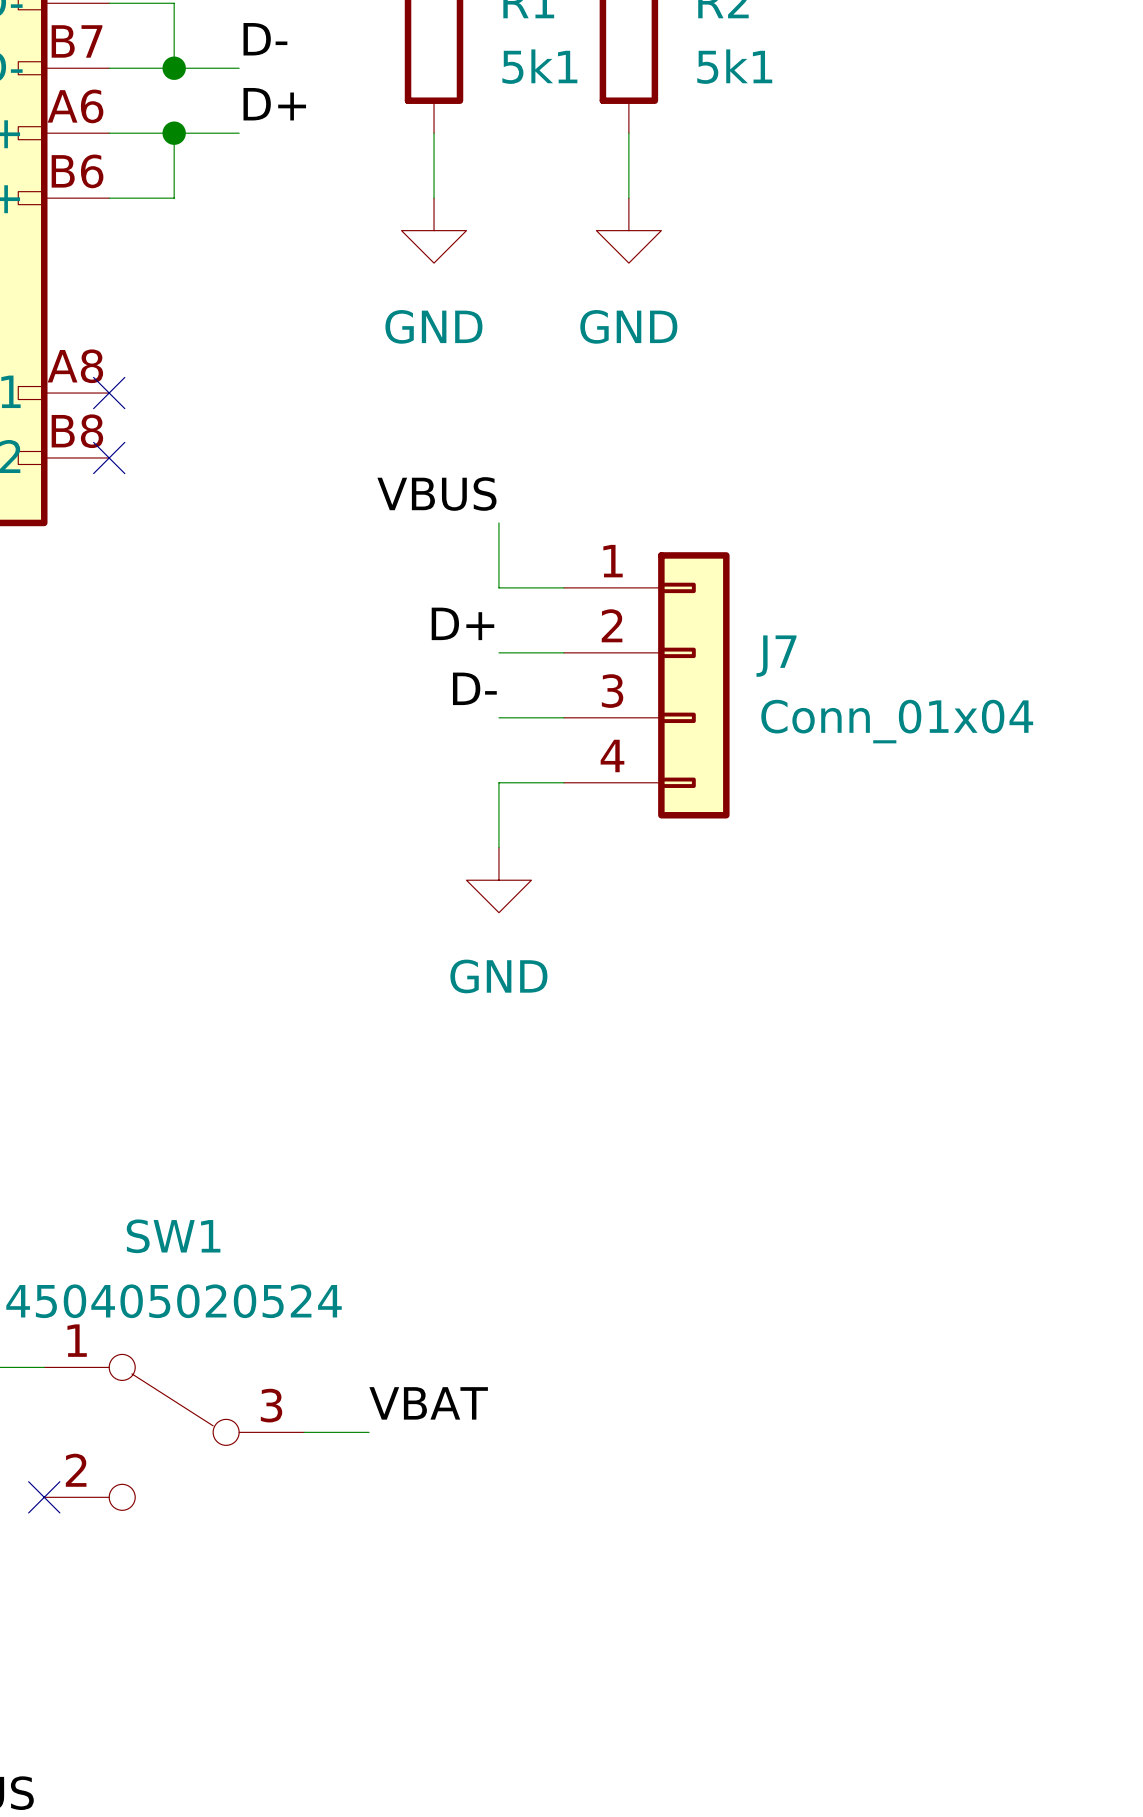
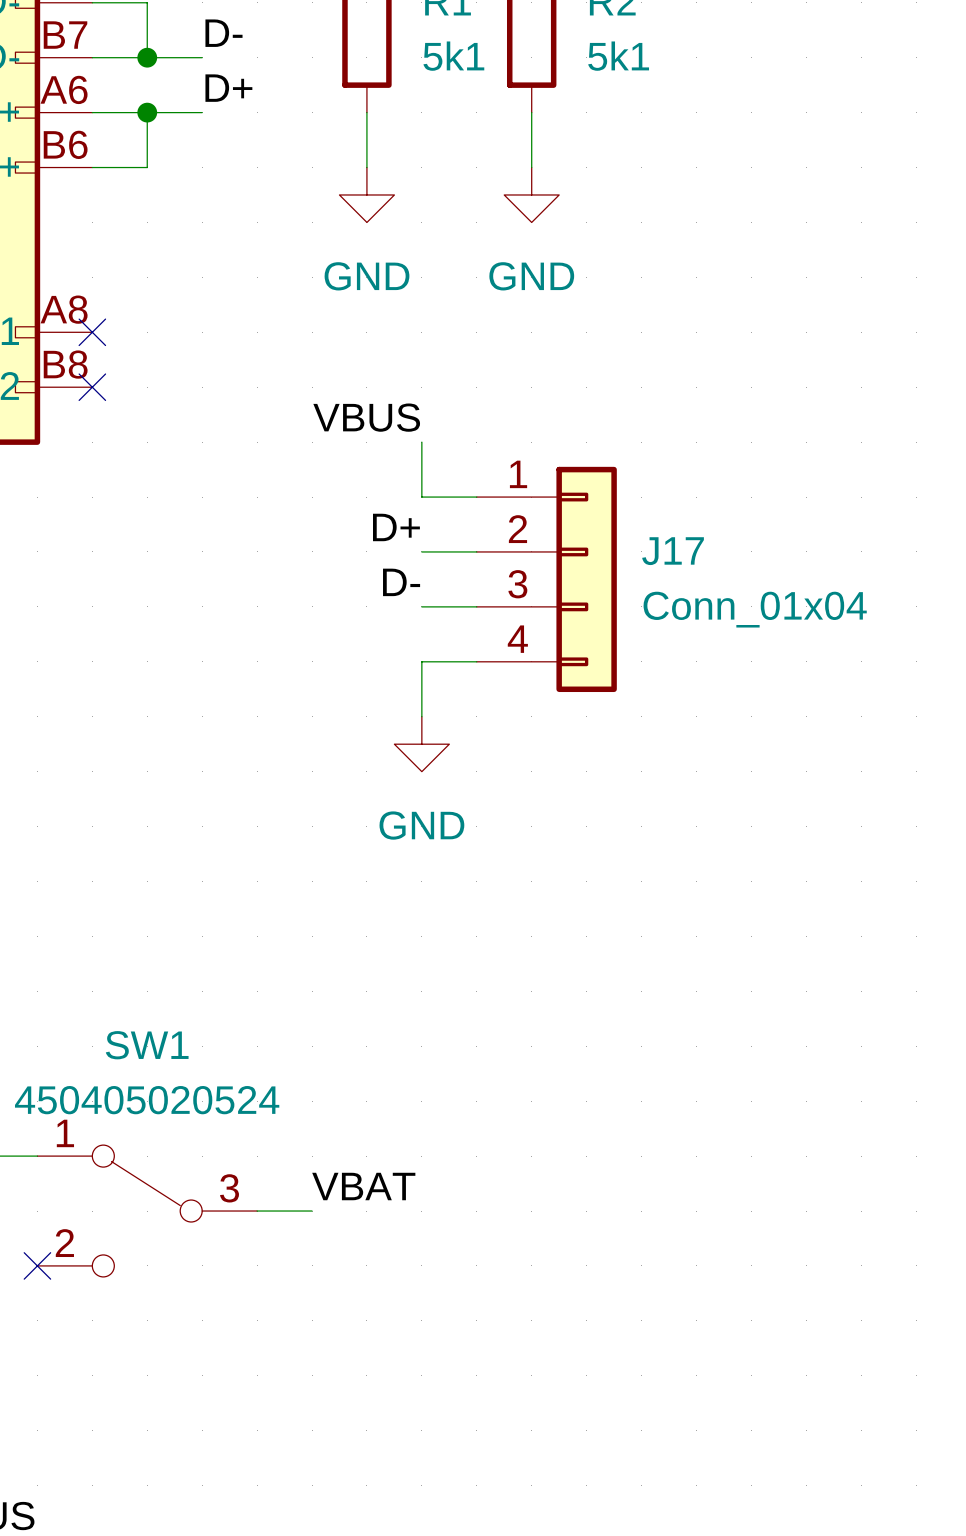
J7 name: J7 (776, 656) -> J17 (673, 551)

